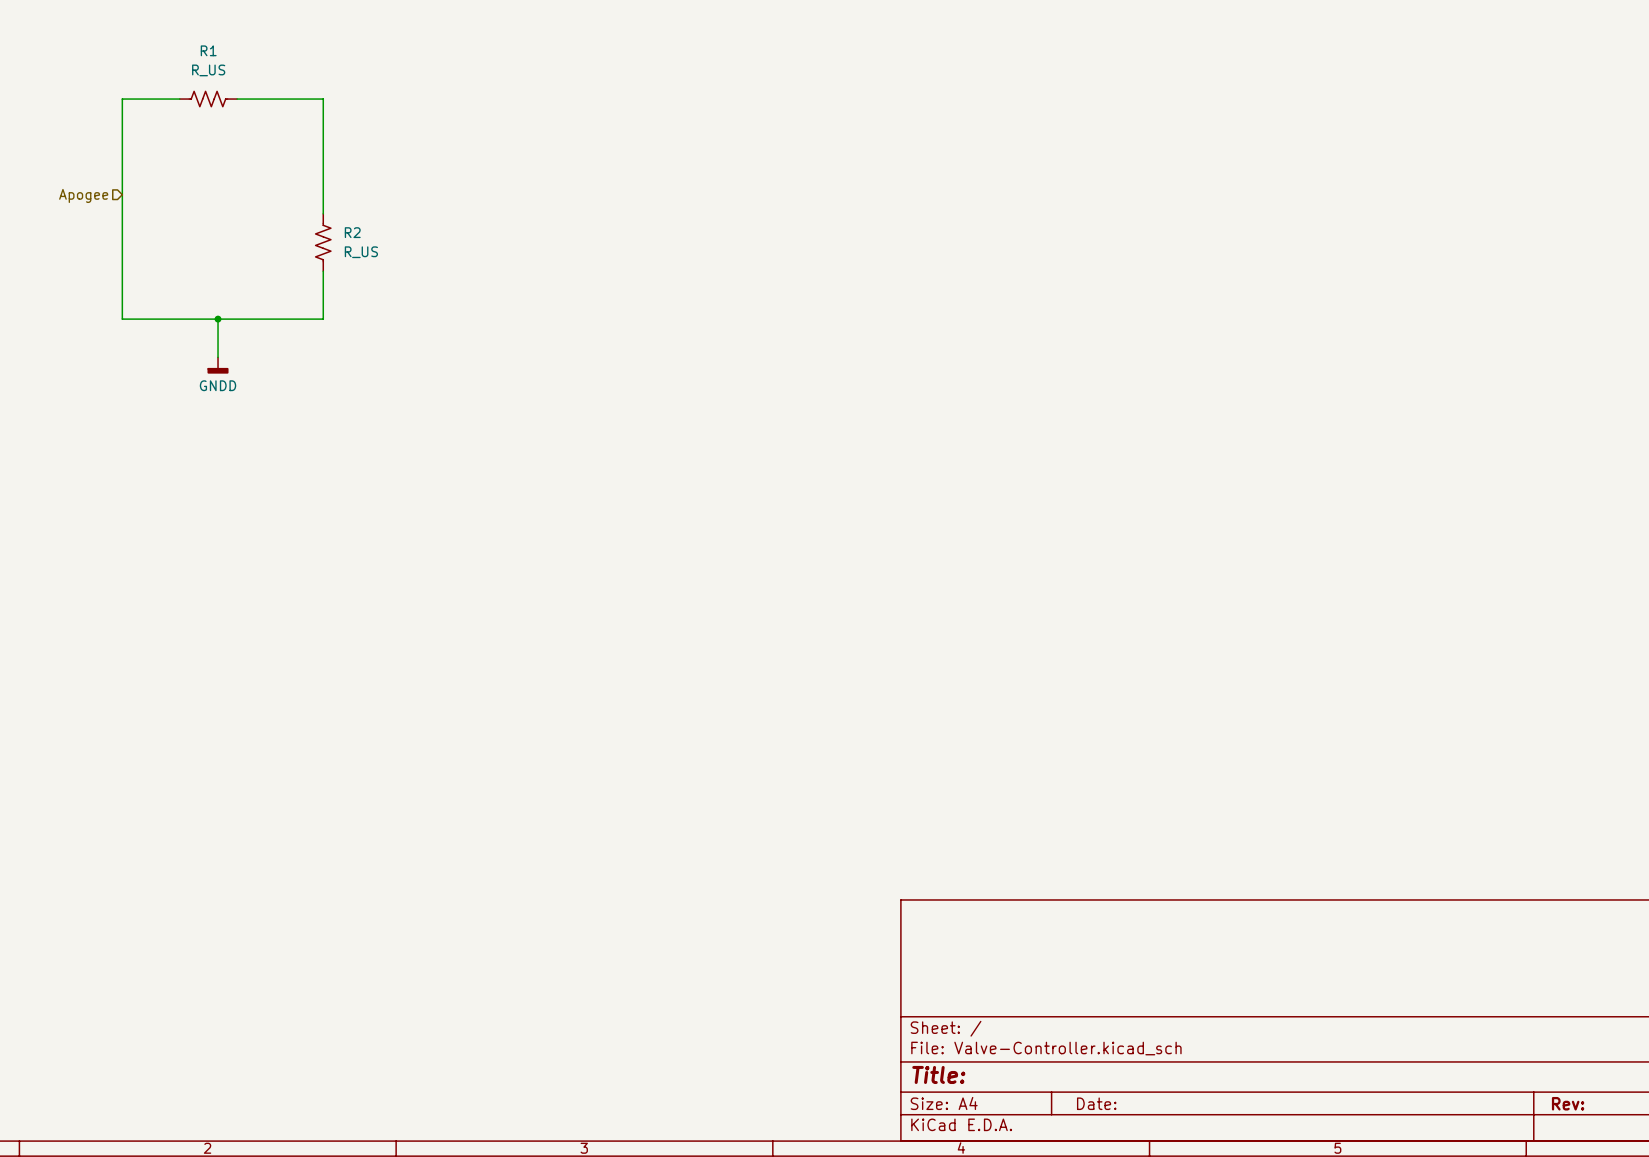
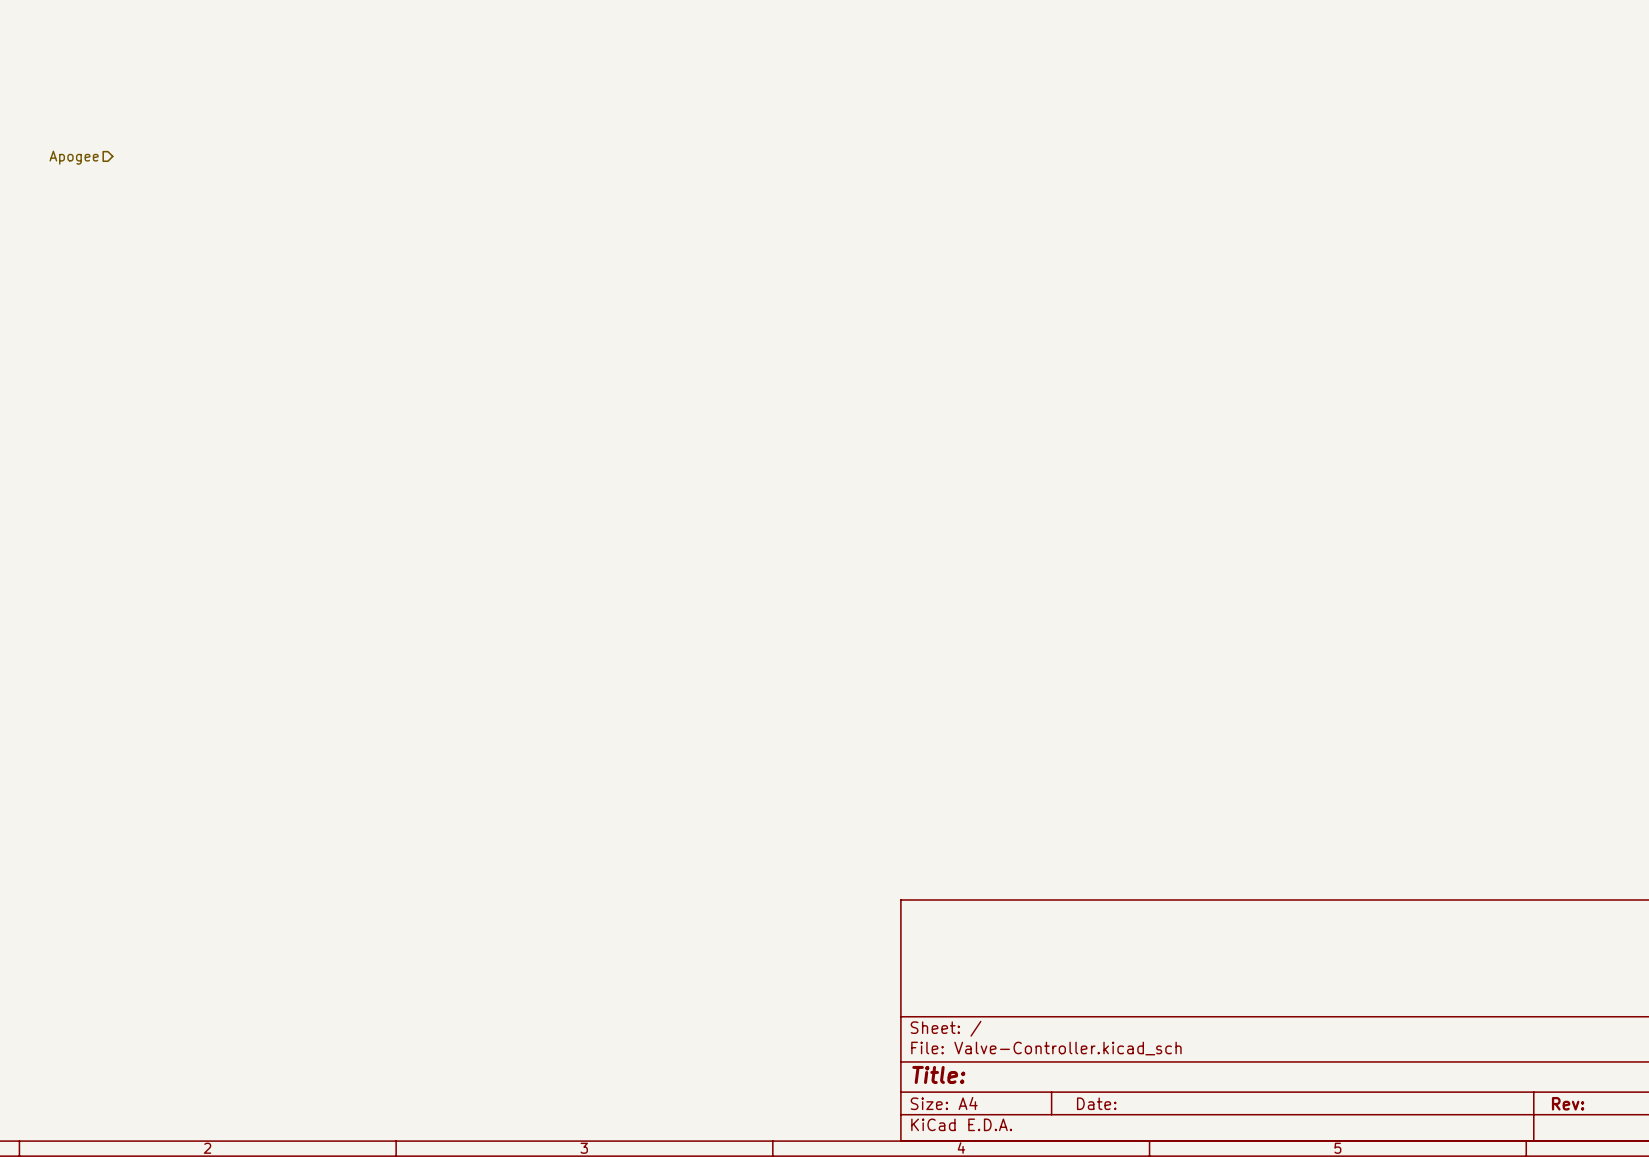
wire: (179, 99) (122, 99) (122, 319) (323, 319) (323, 271) -> none
R1: R_US (208, 99) -> none
wire: (237, 99) (323, 99) (323, 213) -> none
hierarchical label position: Apogee (83, 195) -> Apogee (74, 157)
R2: R_US (323, 242) -> none
wire: (218, 319) (218, 357) -> none
junction: (218, 319) -> none
power symbol: GNDD (218, 365) -> none

